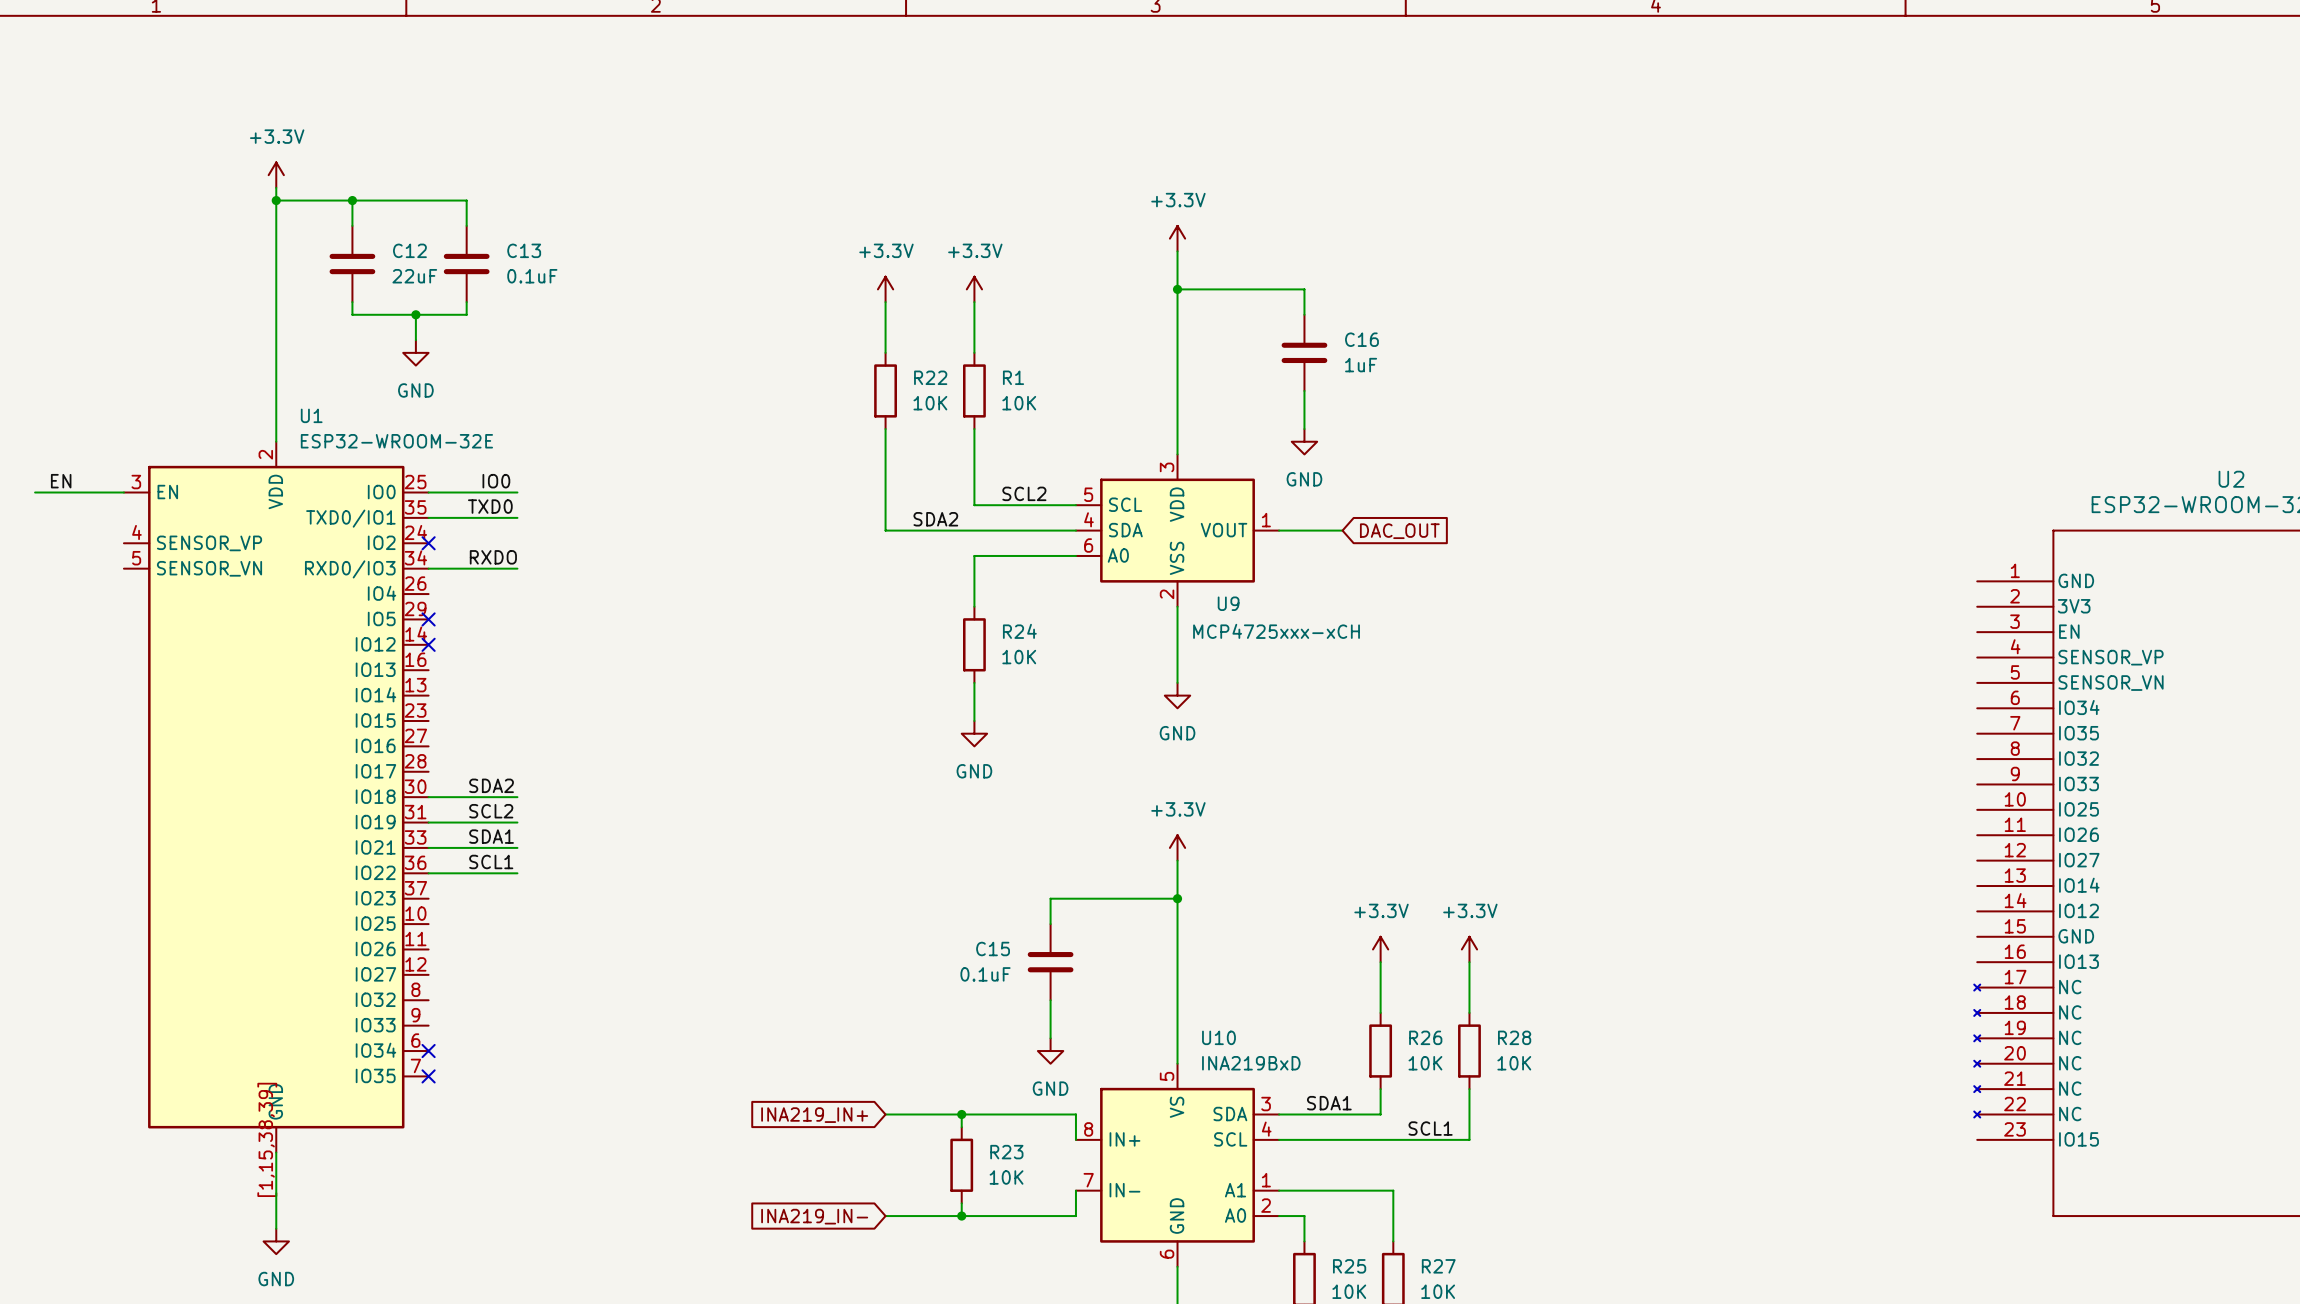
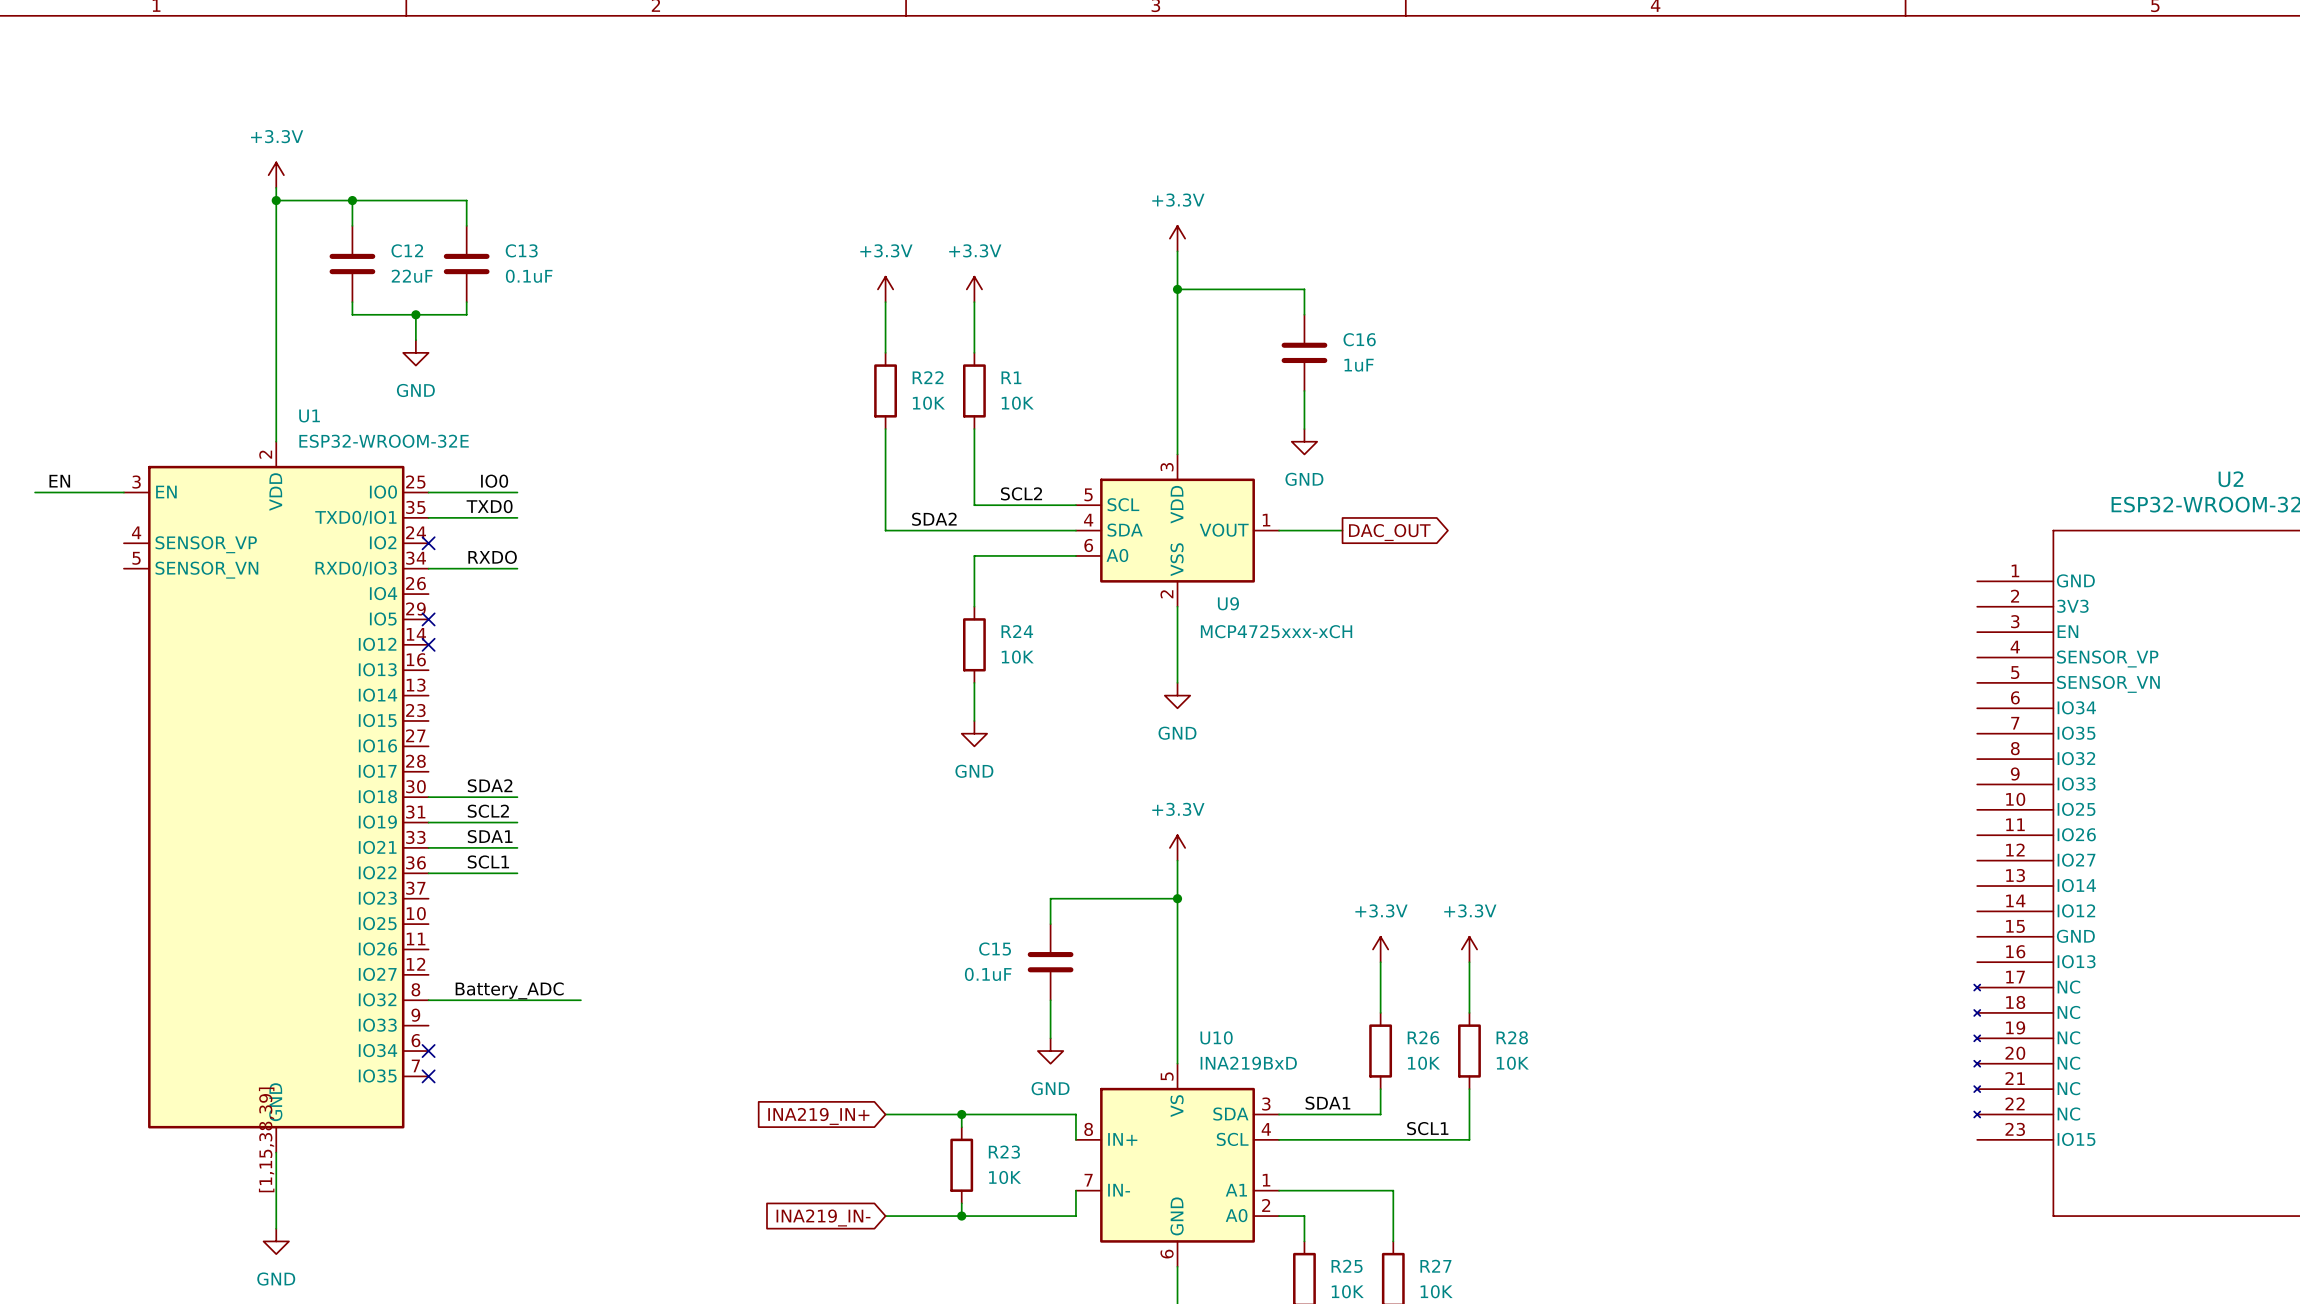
global label shape: input (1399, 531) -> output (1389, 532)
label: none -> Battery_ADC (509, 990)
wire: none -> (428, 1000) (580, 1000)

